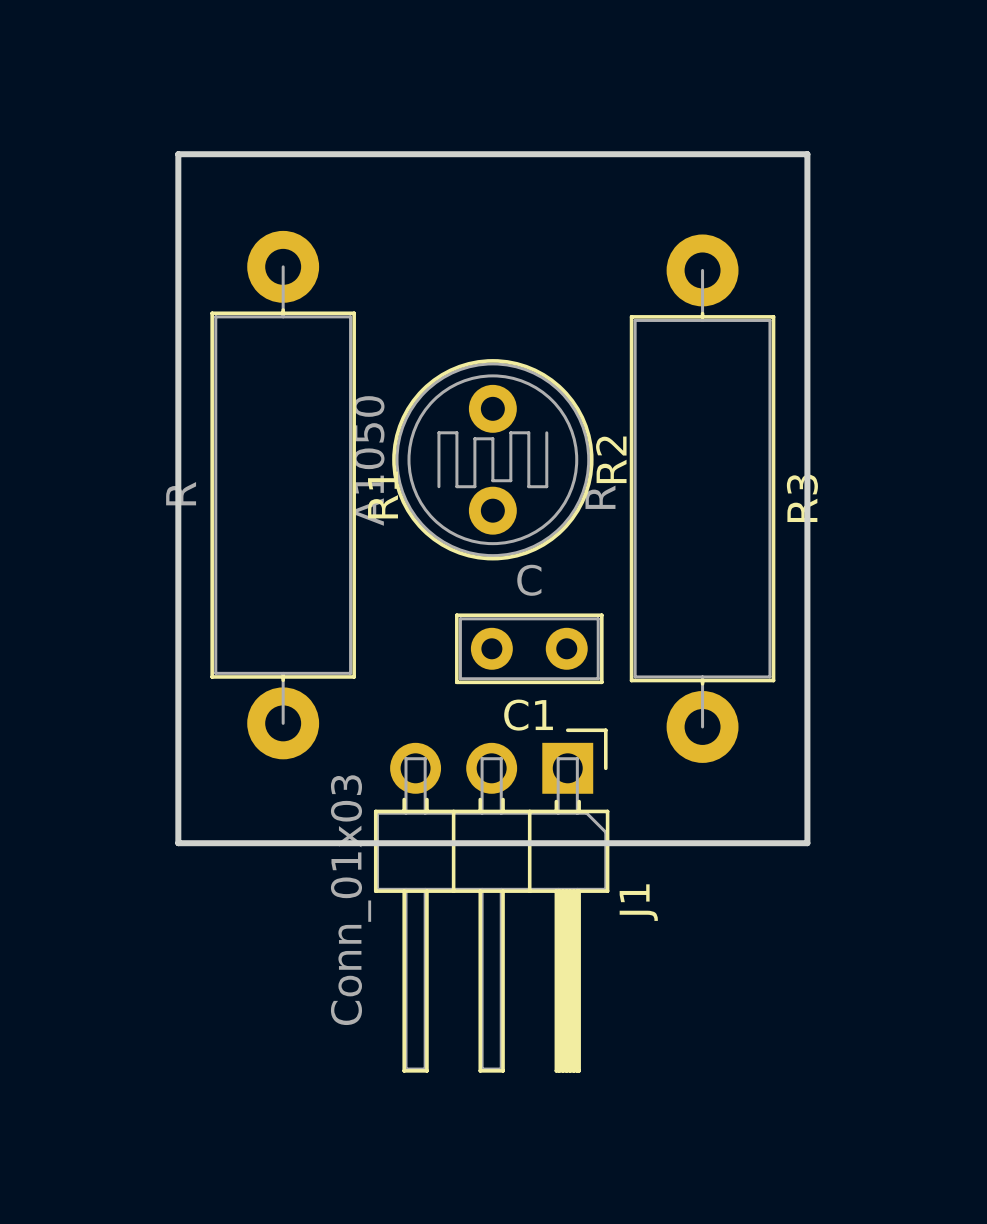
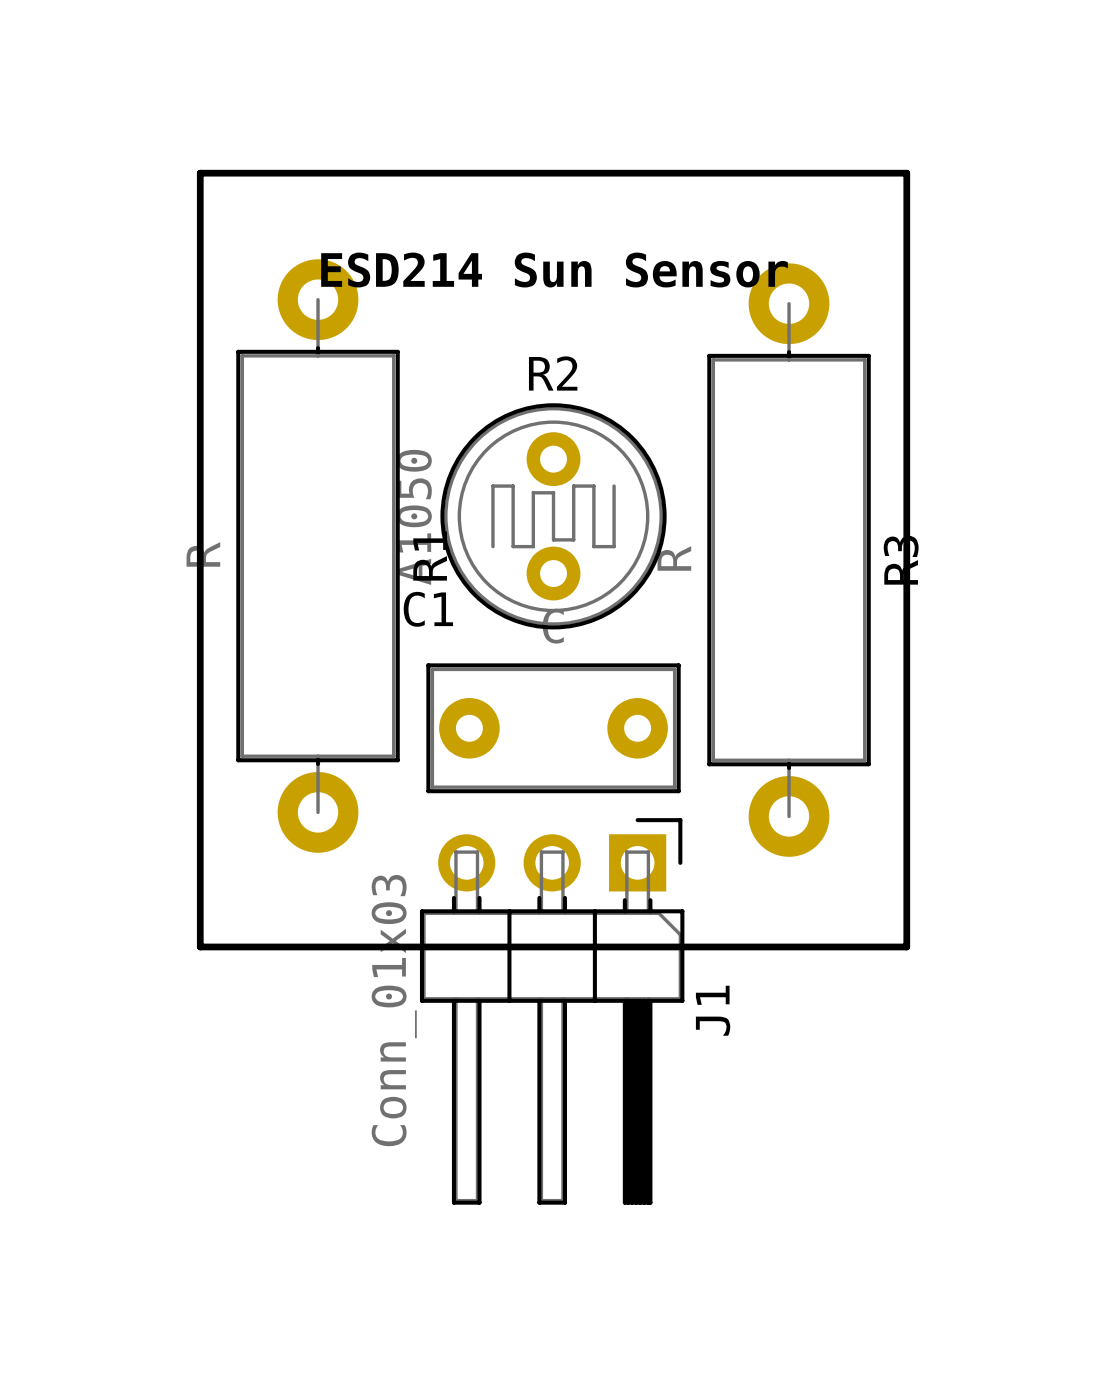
text: none -> ESD214 Sun Sensor (554, 270)
R2 name rotation: 0° (611, 459) -> 90° clockwise (553, 373)
R2 name position: R2 (611, 459) -> R2 (553, 373)
C1 footprint: [455, 613, 604, 685] -> [426, 663, 681, 794]
C1 name position: C1 (528, 715) -> C1 (428, 609)

